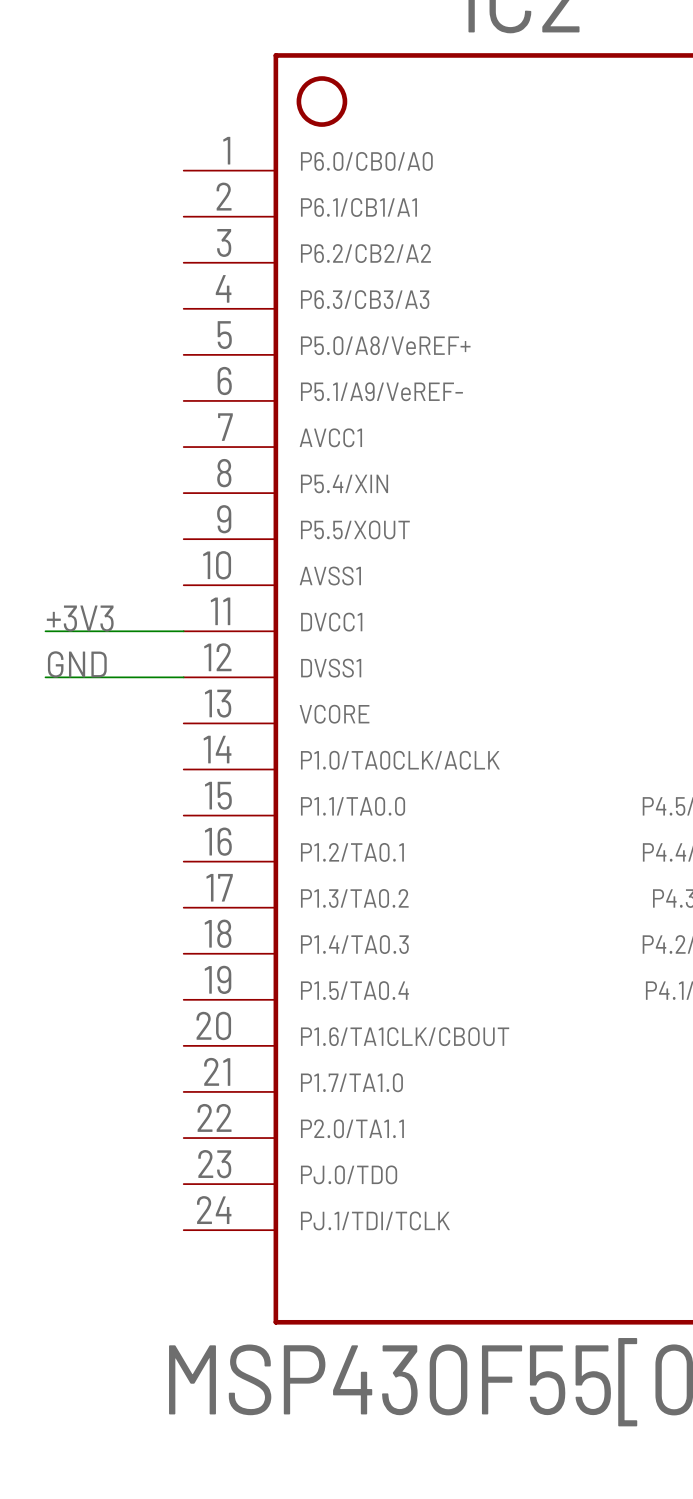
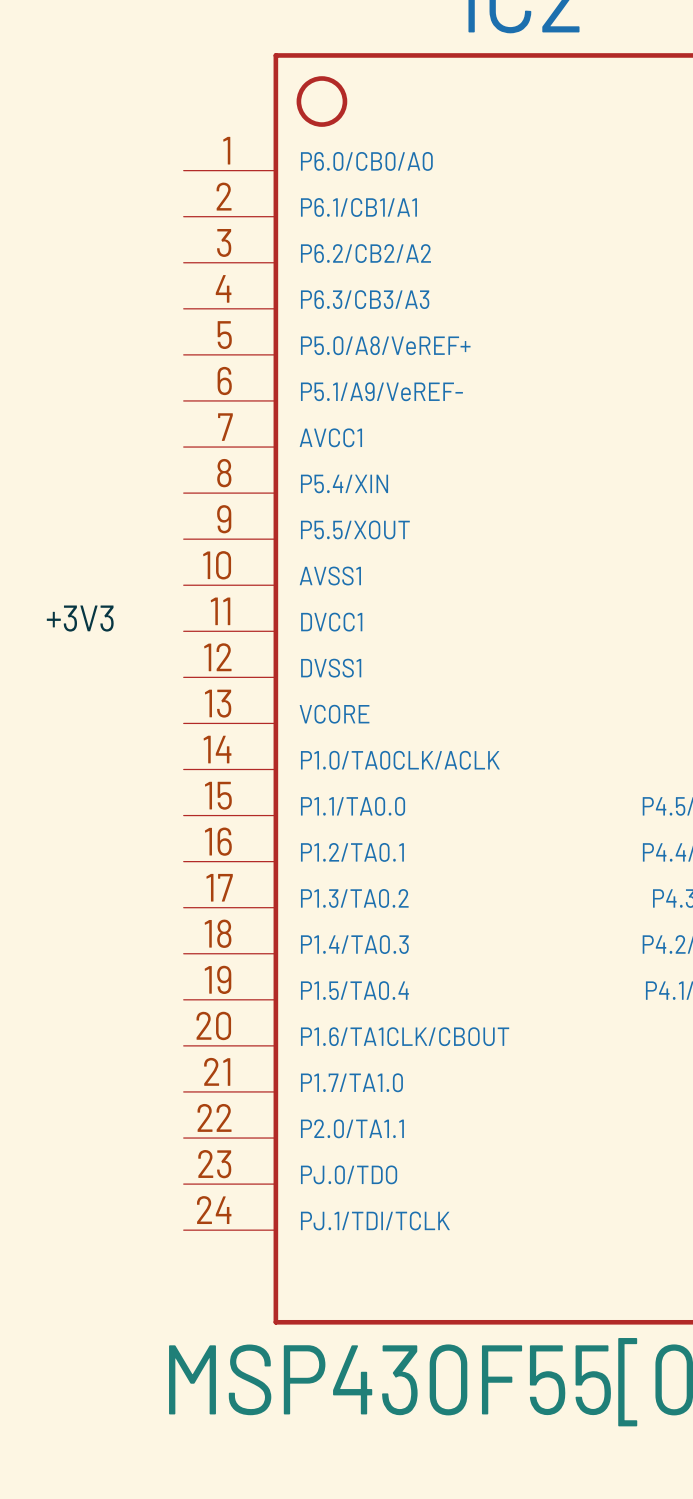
wire: (45, 631) (183, 631) -> none
label: GND (77, 664) -> none
wire: (45, 677) (183, 677) -> none

